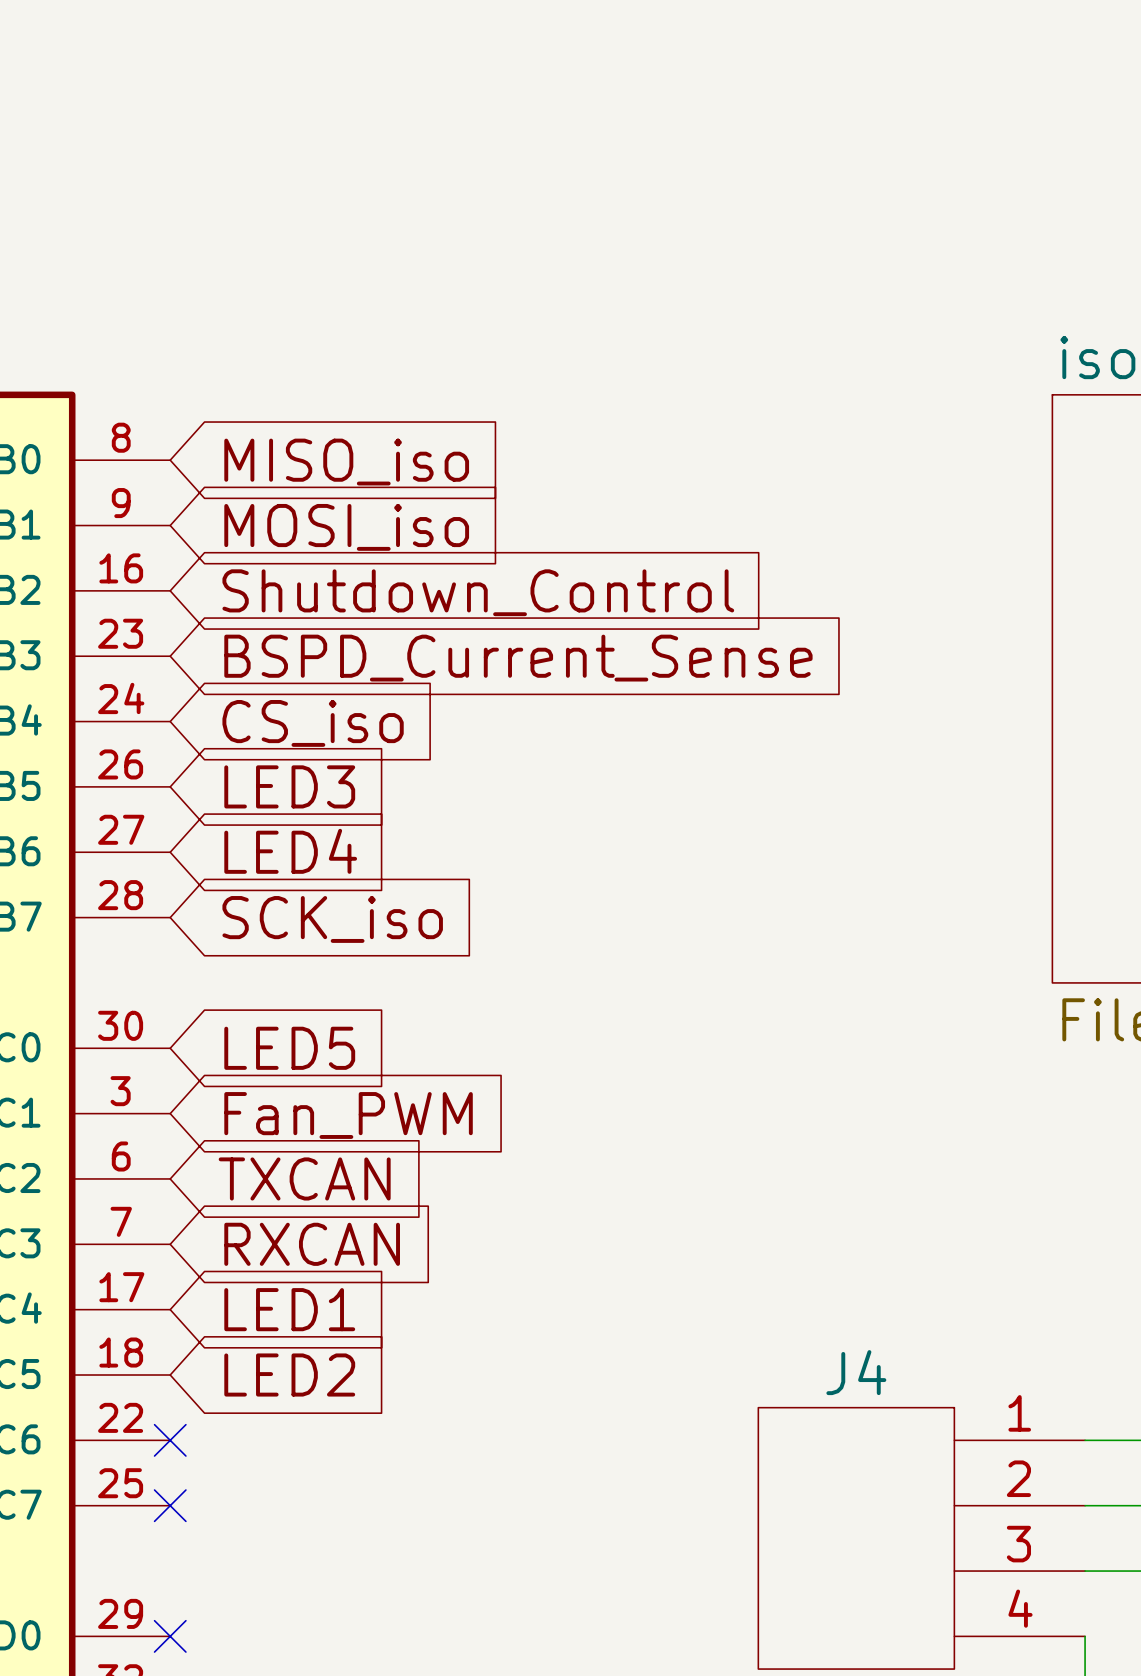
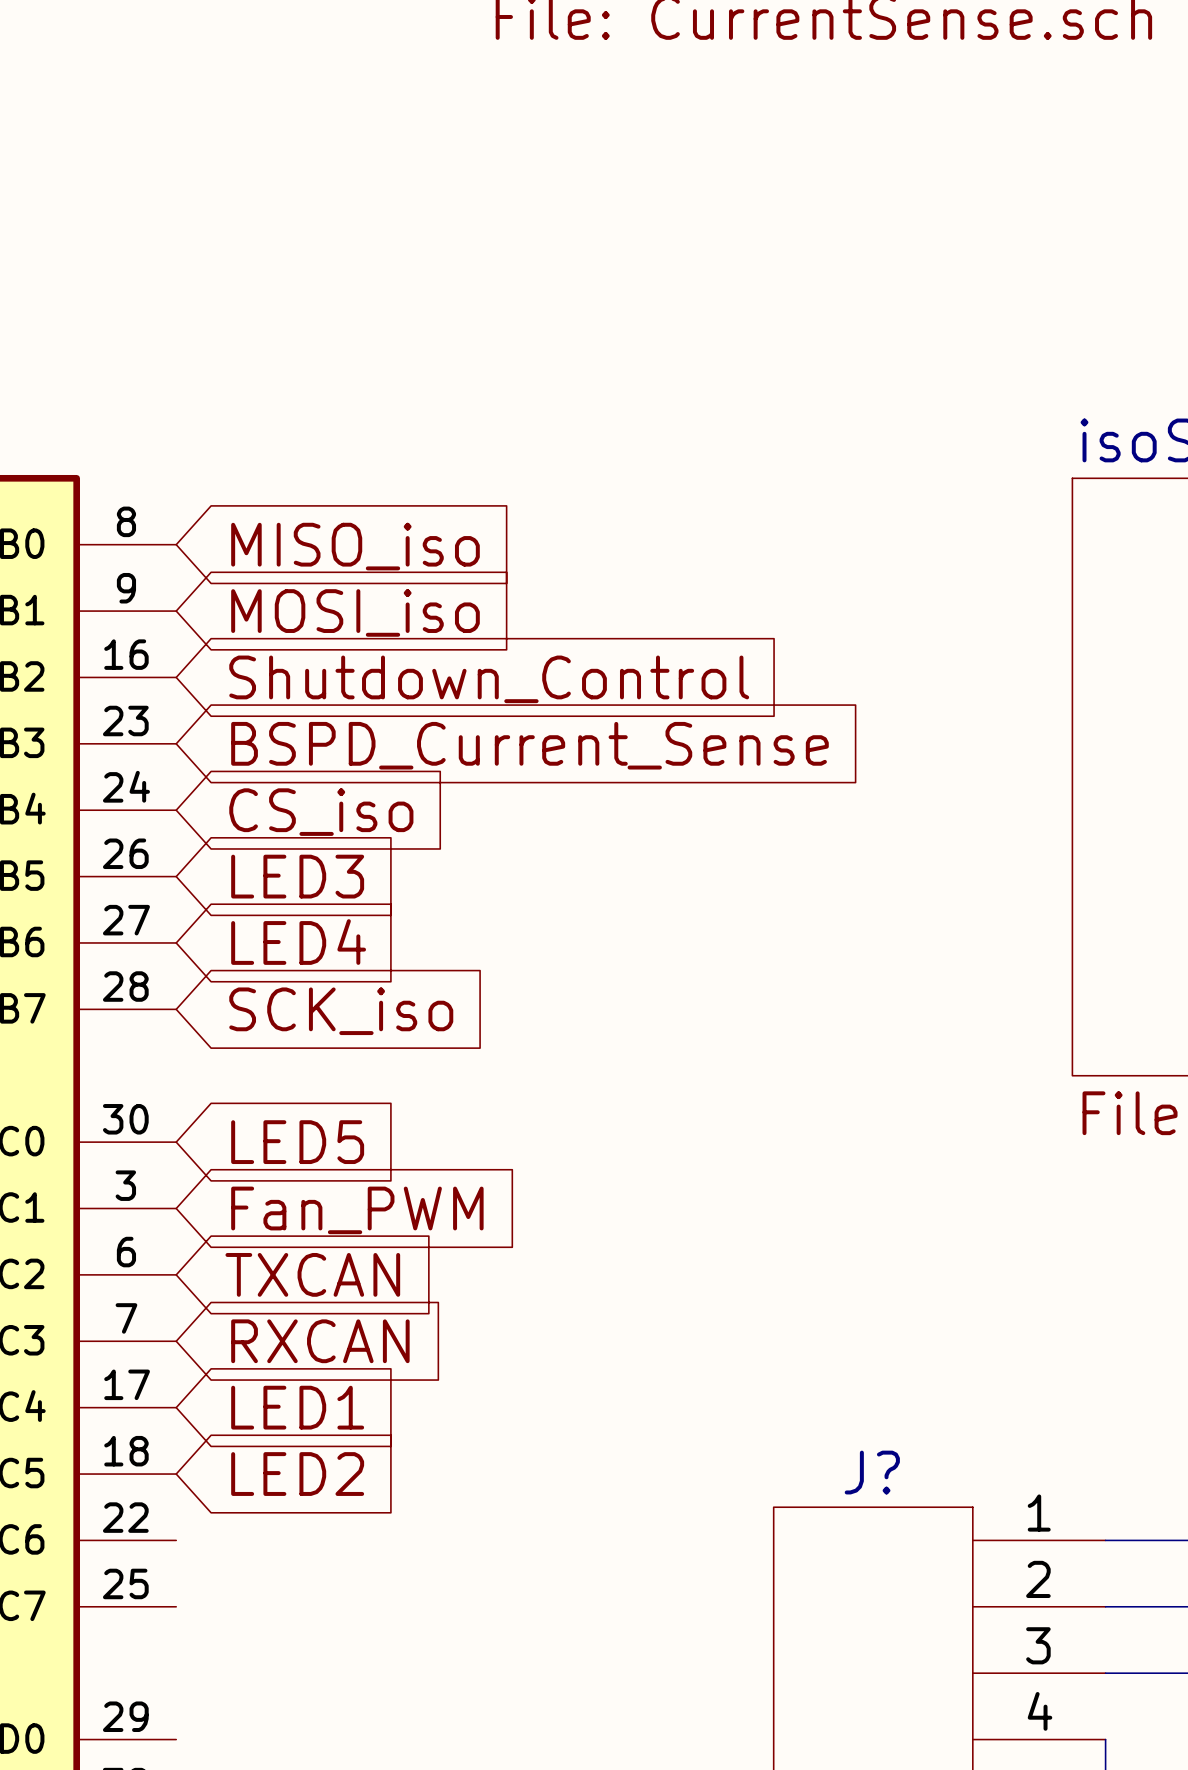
J4 name: J4 (856, 1372) -> J? (872, 1472)
no-connect mark: (170, 1440) -> none
no-connect mark: (170, 1505) -> none
no-connect mark: (170, 1636) -> none

